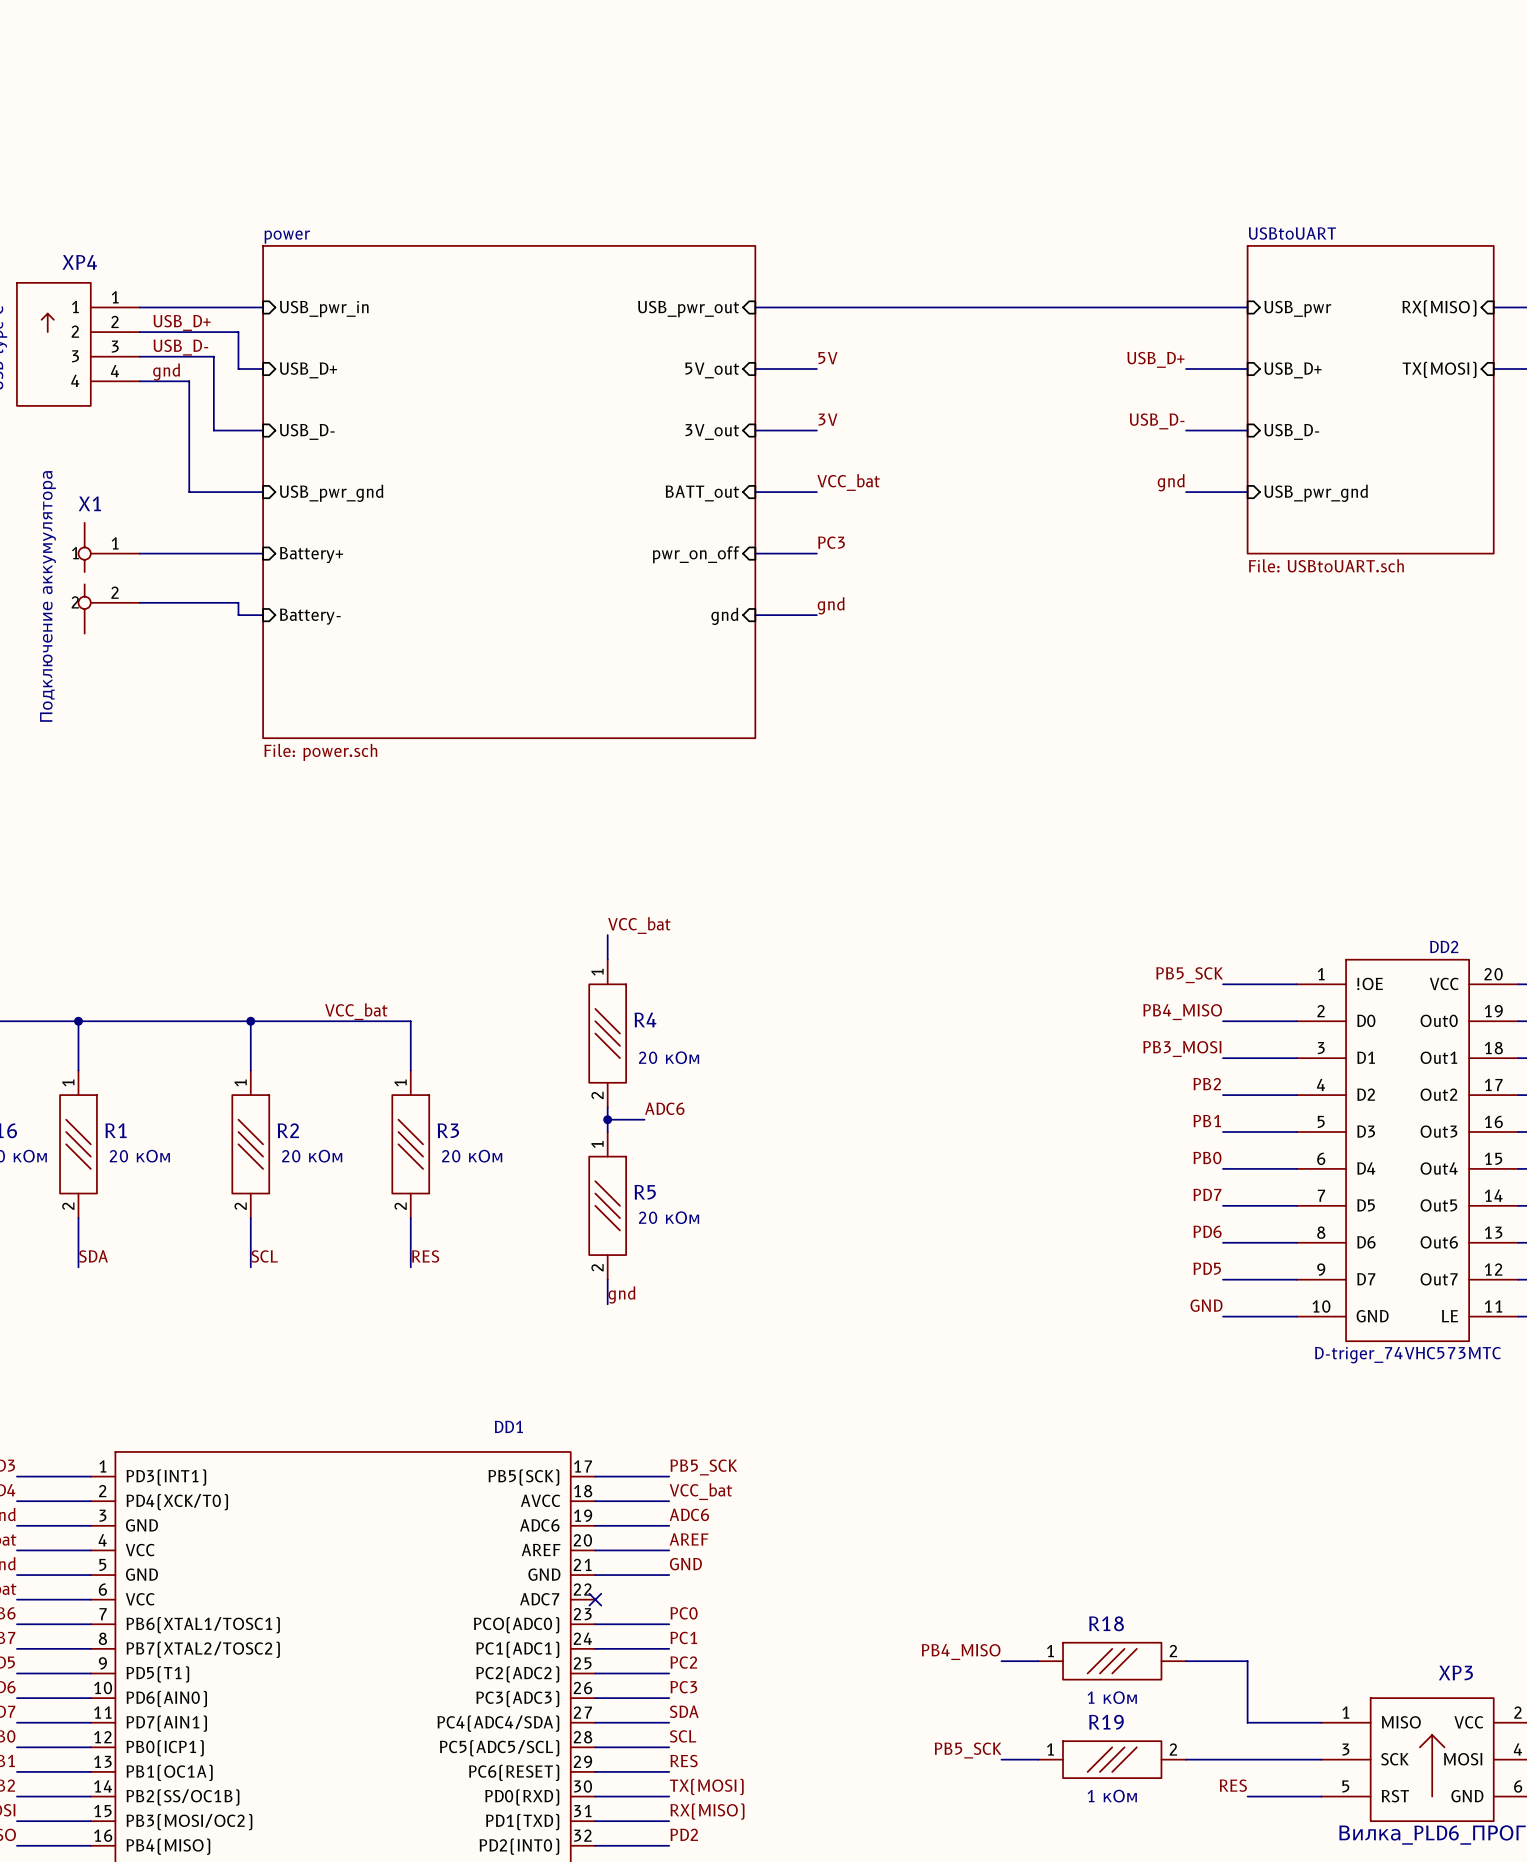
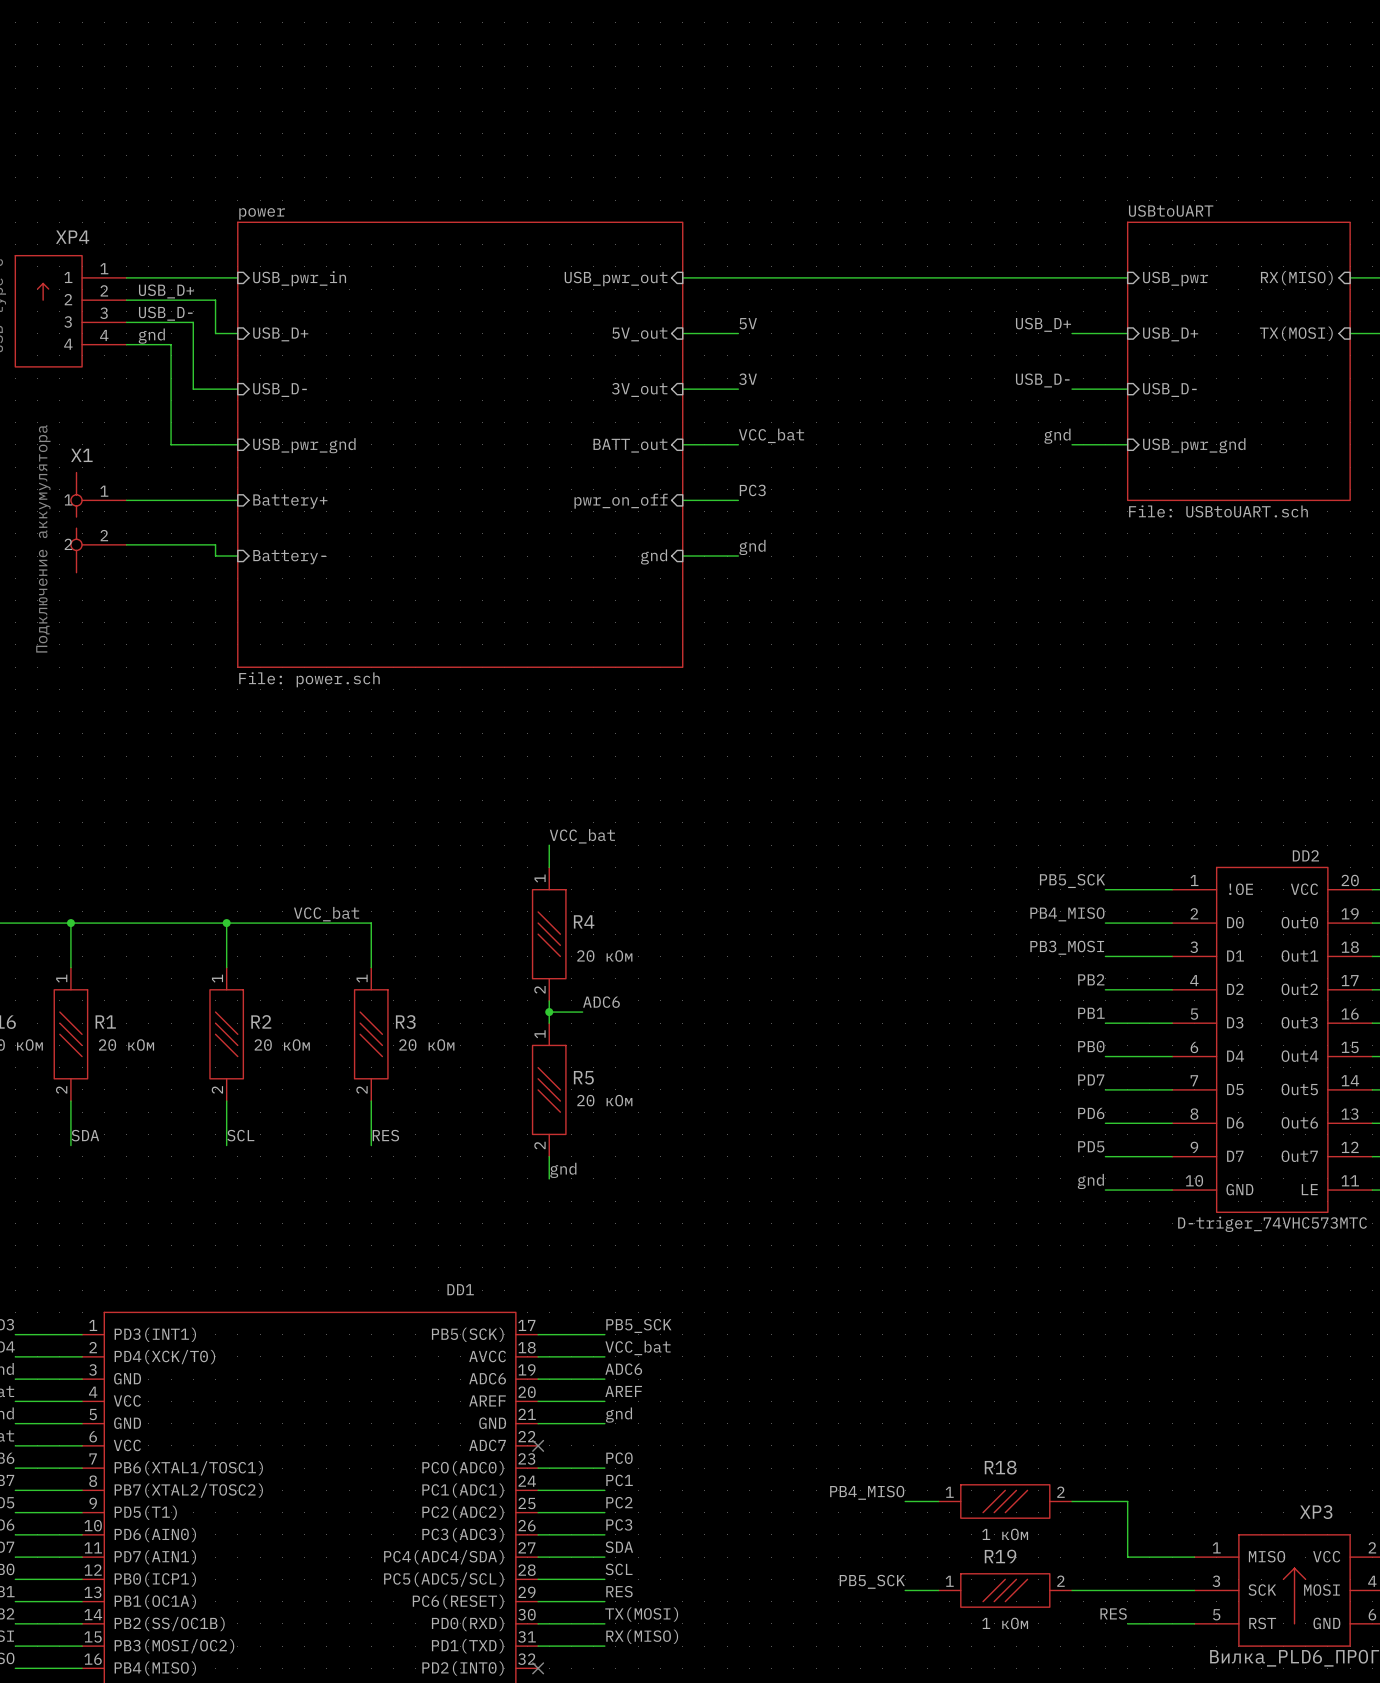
label: GND (1206, 1305) -> gnd (1090, 1181)
label: GND (685, 1564) -> gnd (618, 1415)
label: PD2 (684, 1834) -> none
wire: (595, 1845) (669, 1845) -> none
no-connect mark: none -> (538, 1668)

